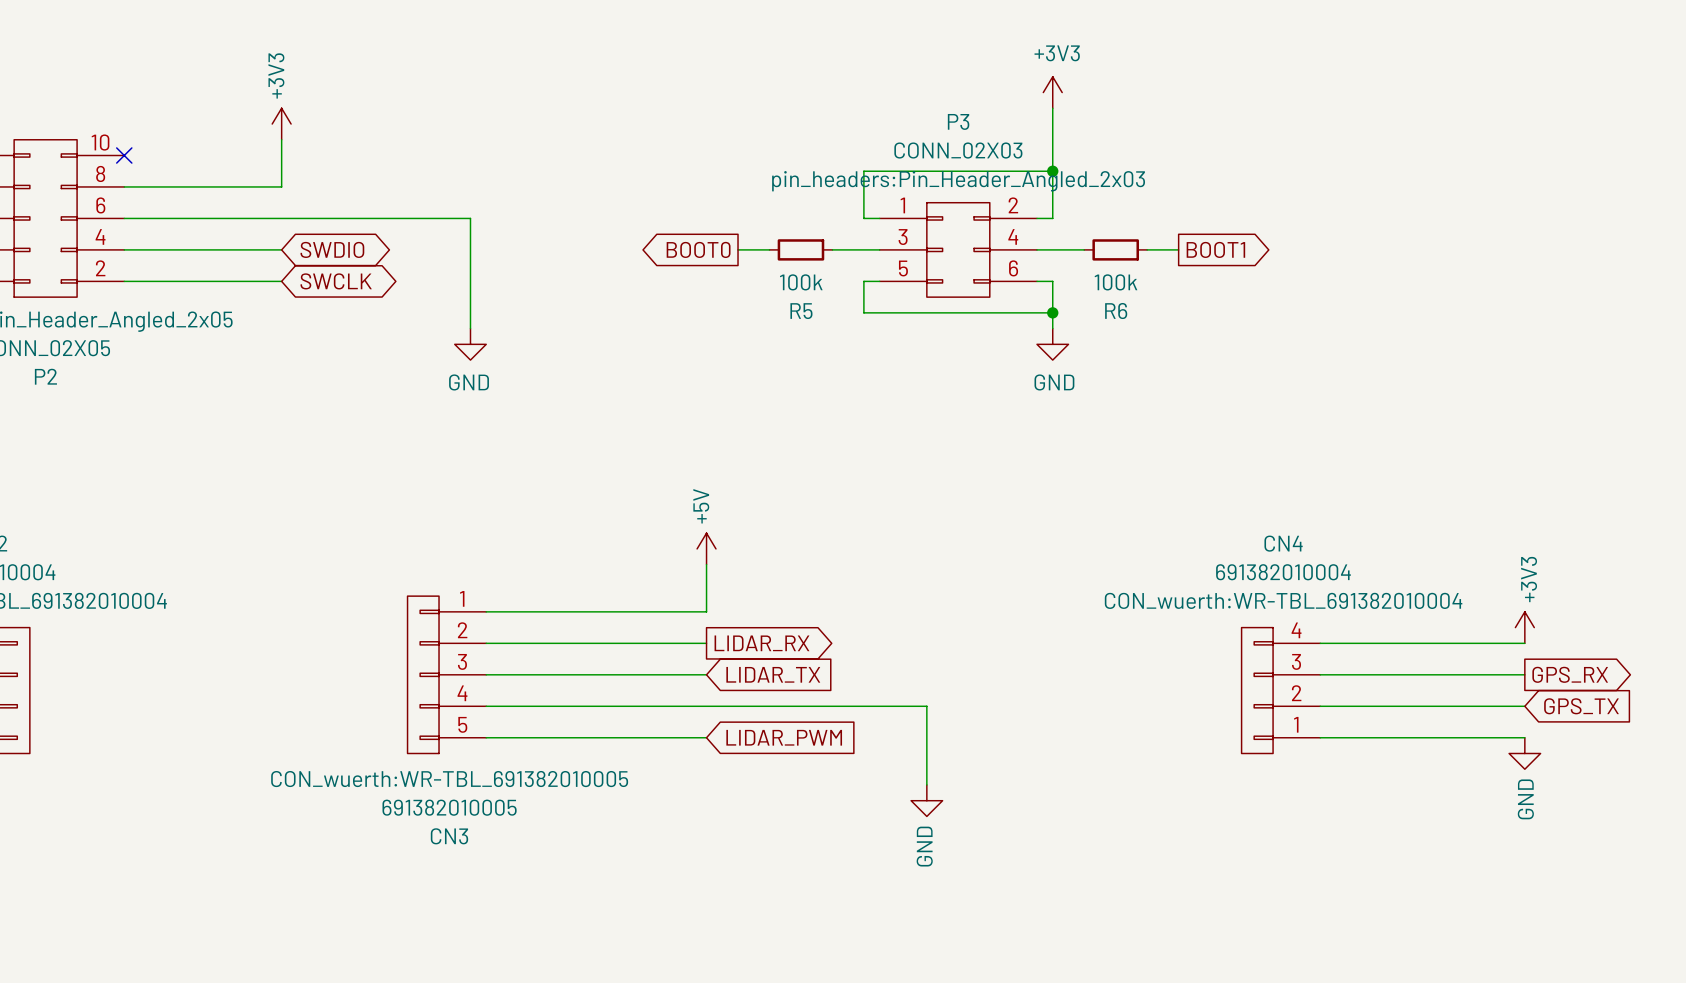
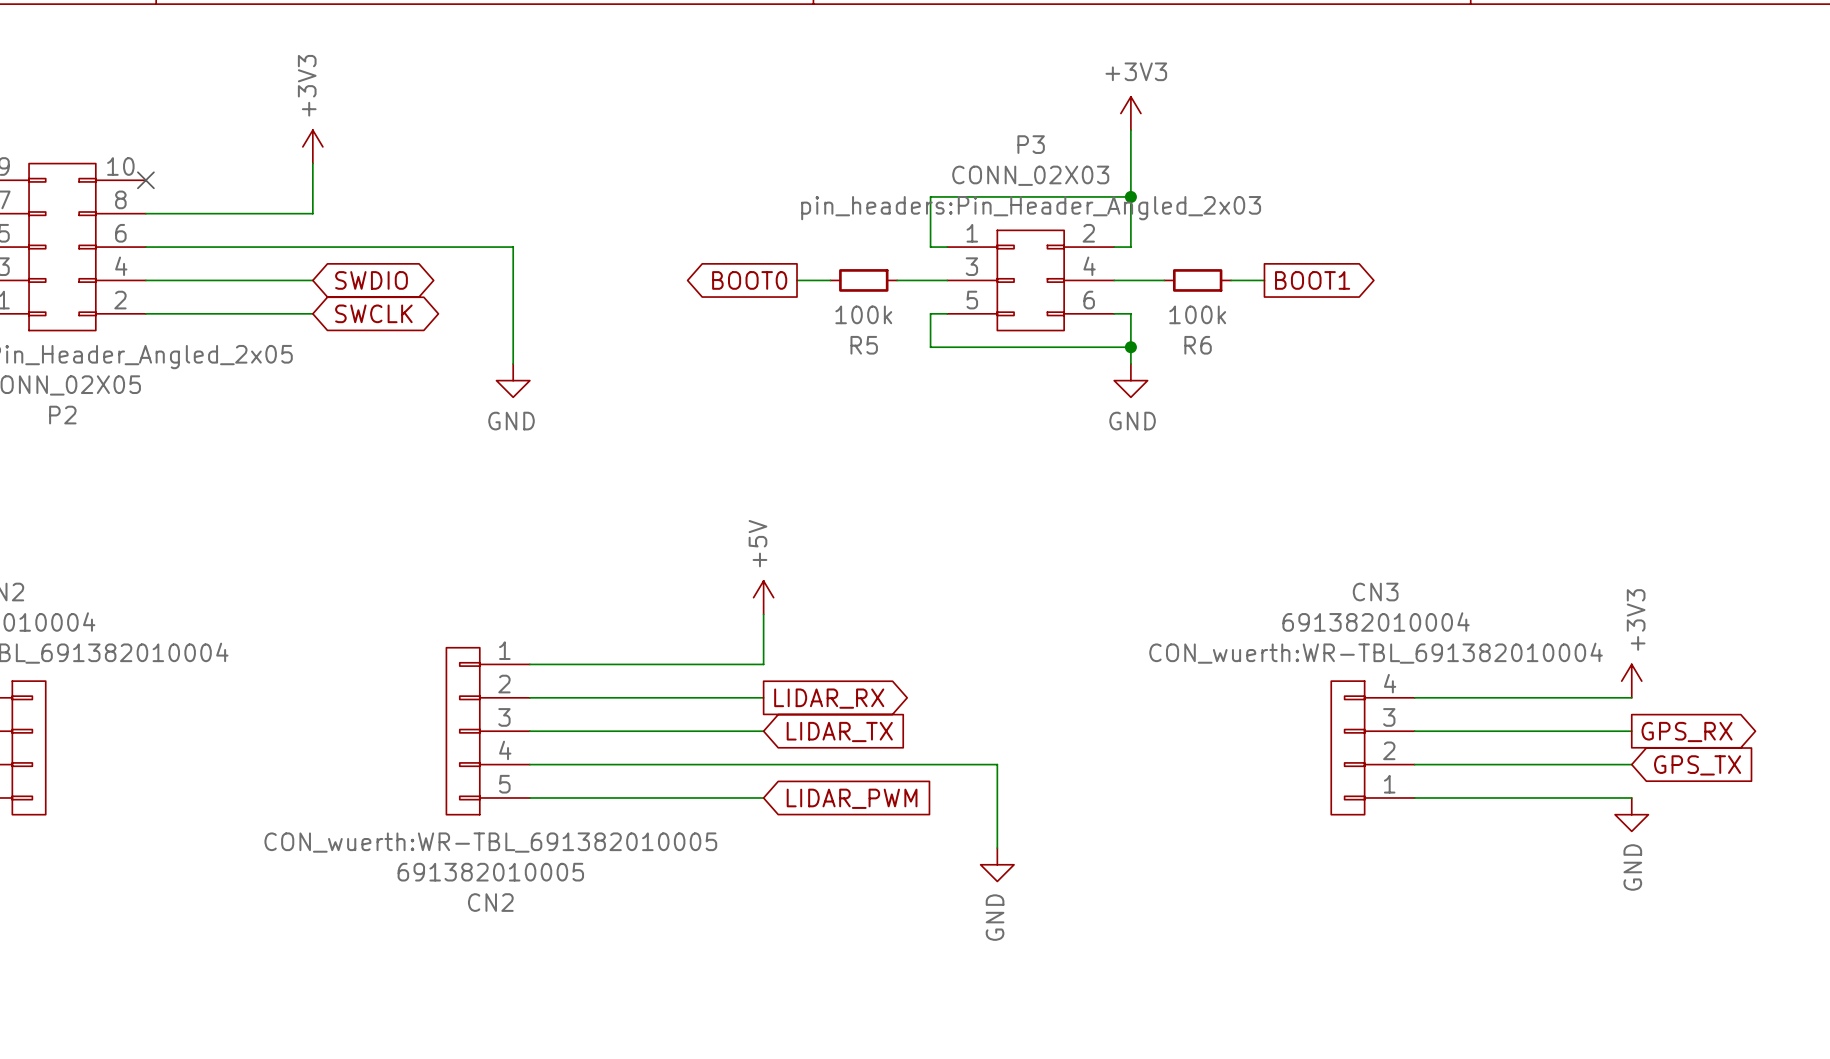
CN4 name: CN4 (1283, 543) -> CN3 (1375, 592)
CN3 name: CN3 (449, 836) -> CN2 (490, 902)

